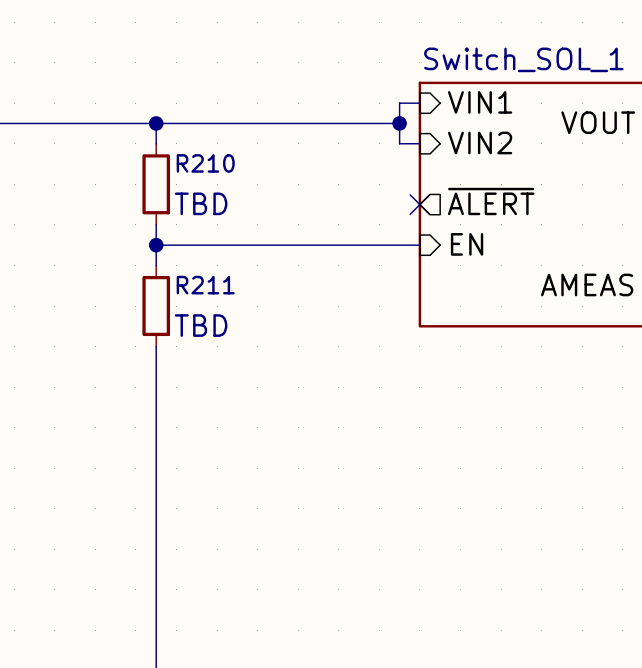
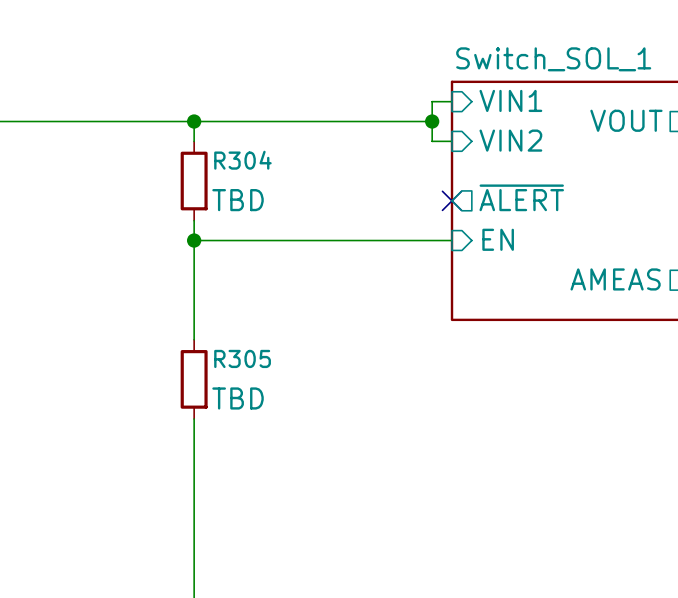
R210 name: R210 (205, 163) -> R304 (242, 160)
R211: TBD (156, 306) -> none
wire: (156, 346) (156, 427) -> (194, 339) (194, 260)
R305: none -> TBD (194, 379)

